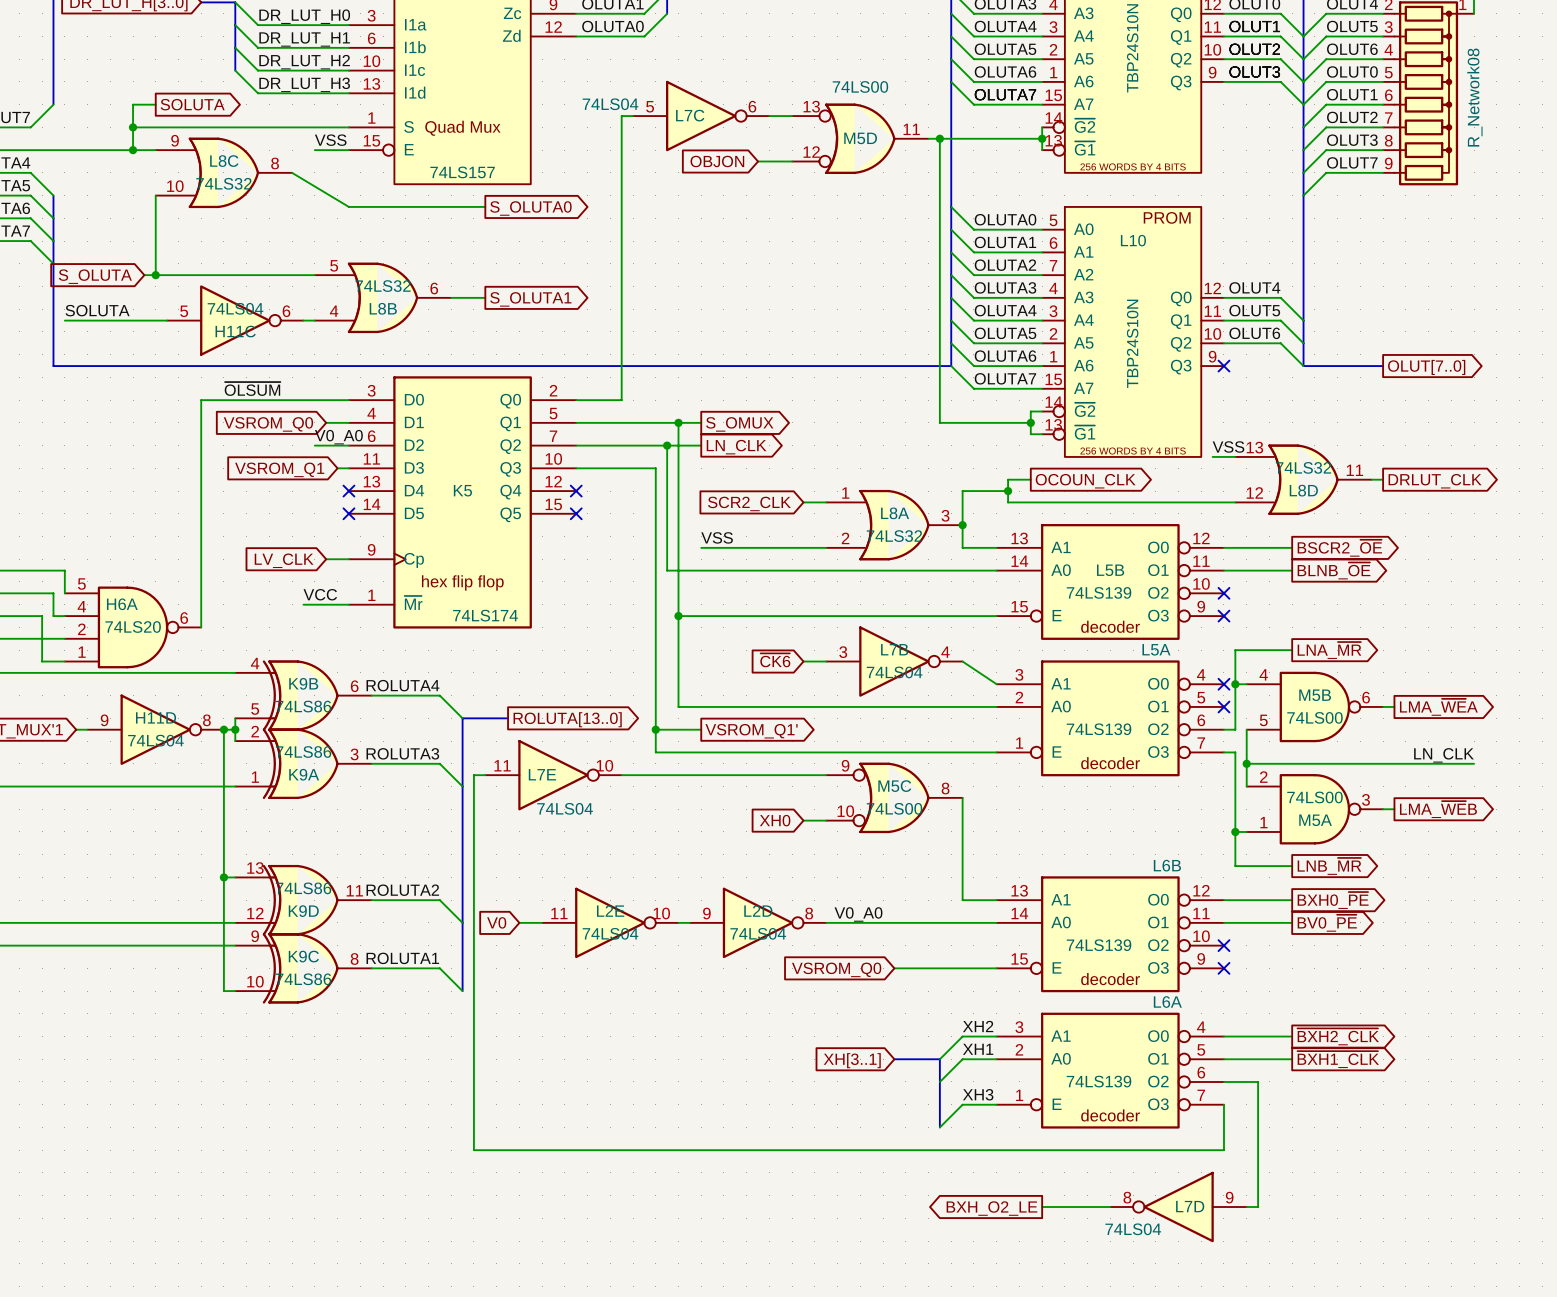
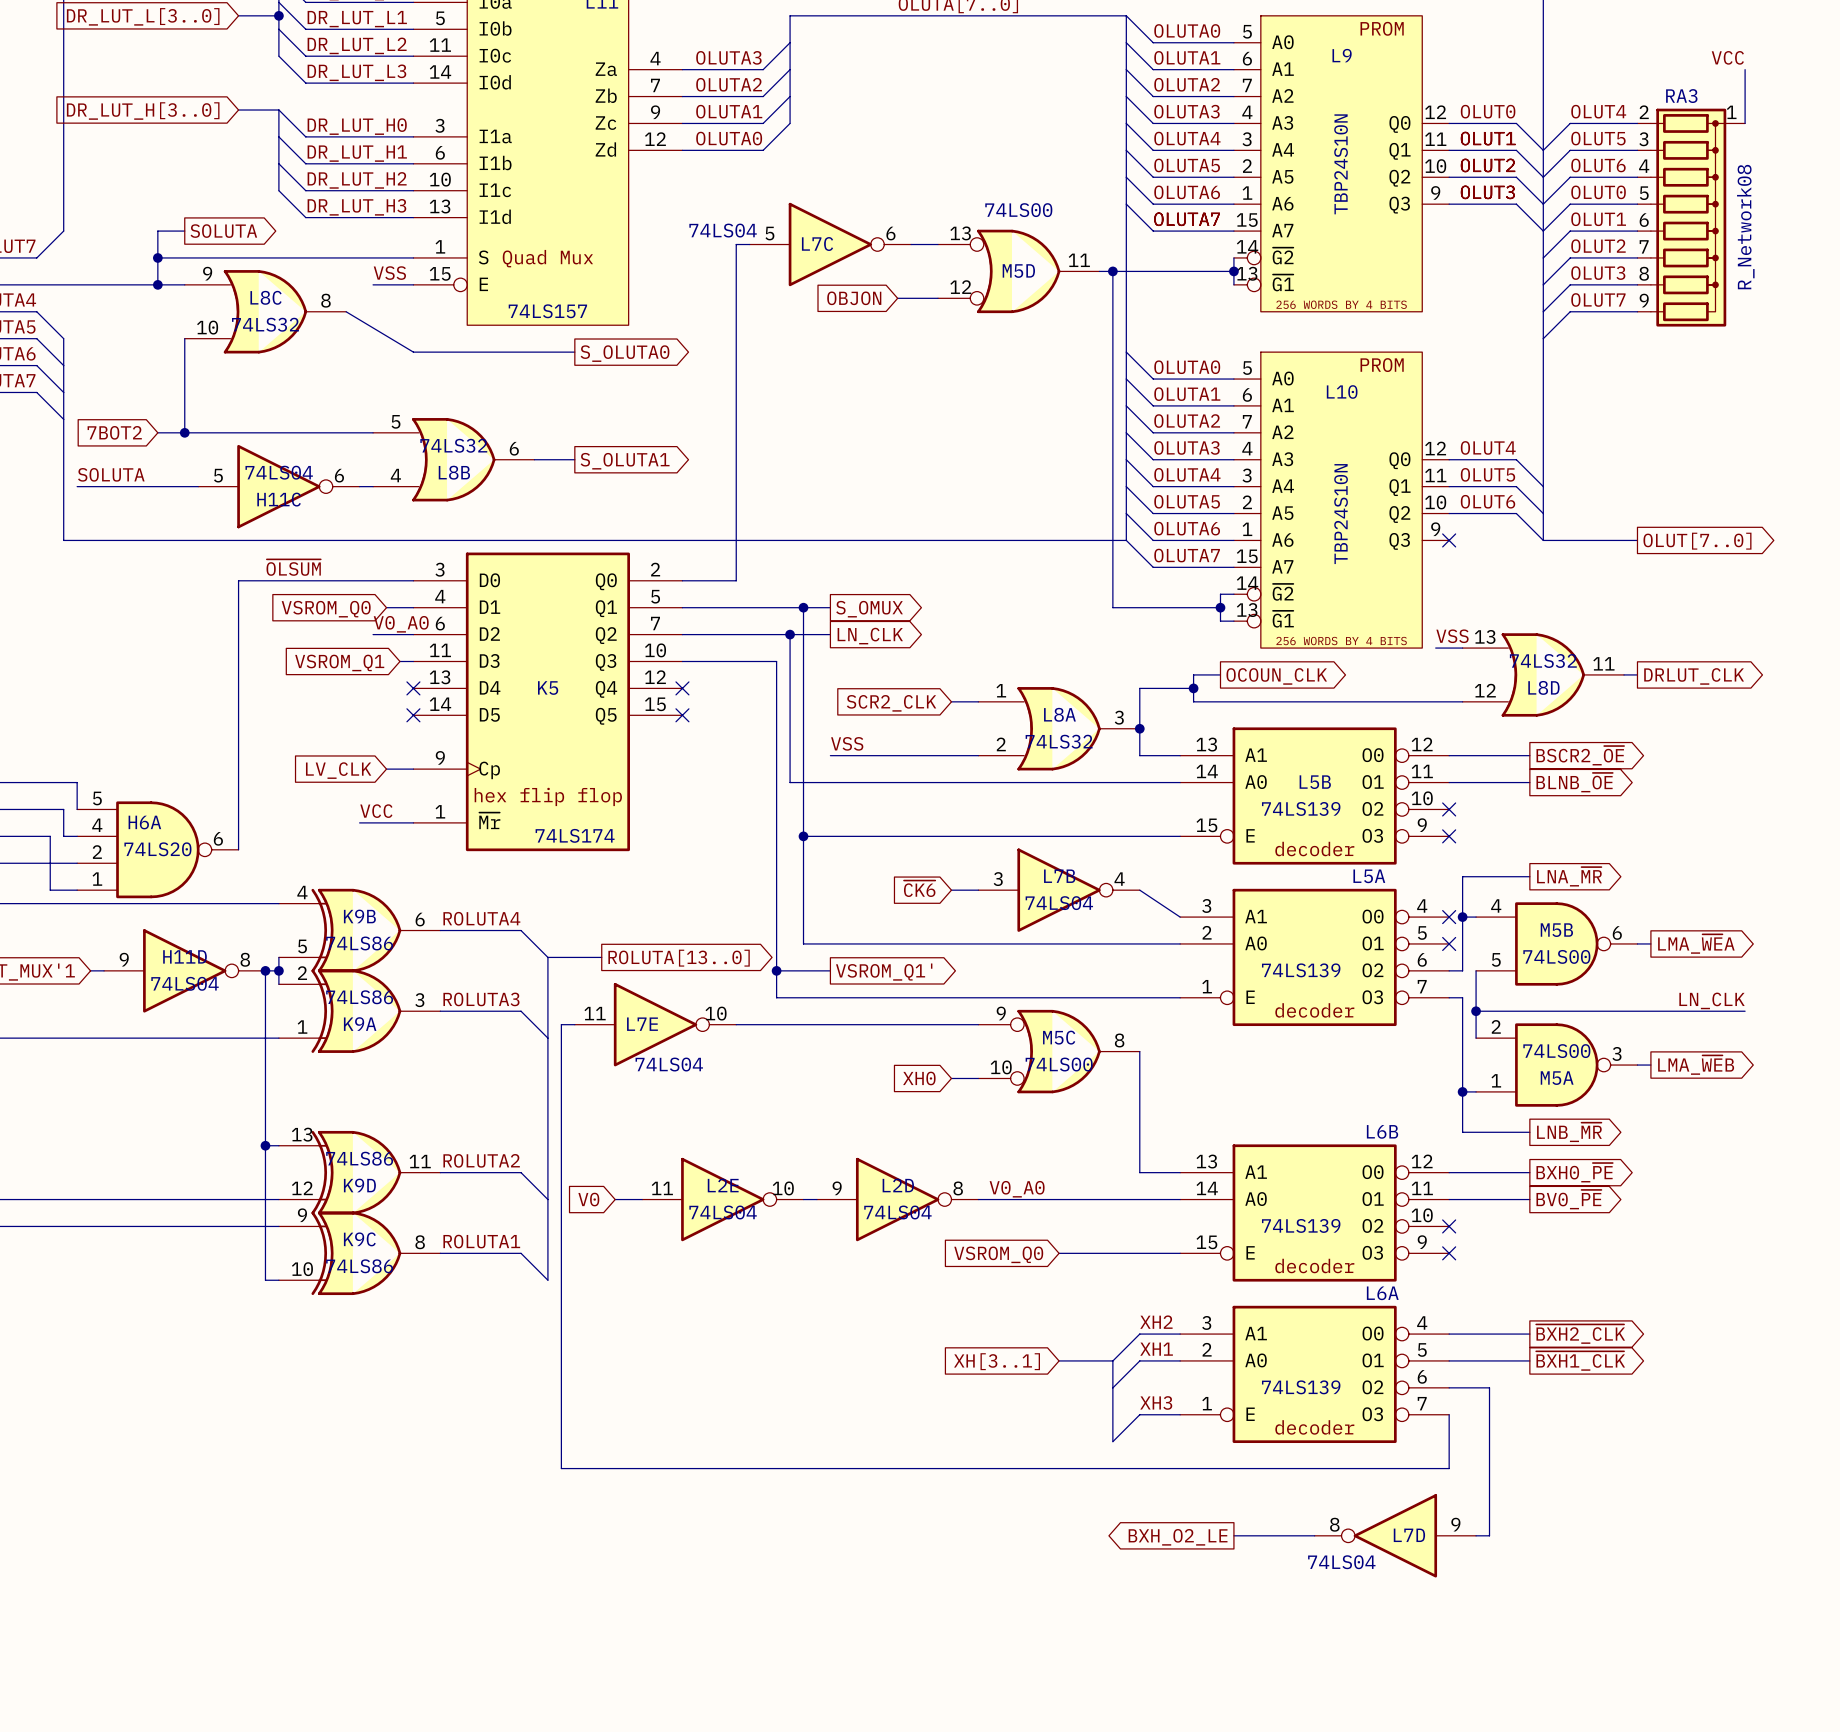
global label: none -> 7BOT2 (114, 432)
wire: none -> (157, 432) (171, 432)
global label: S_OLUTA (95, 276) -> none

